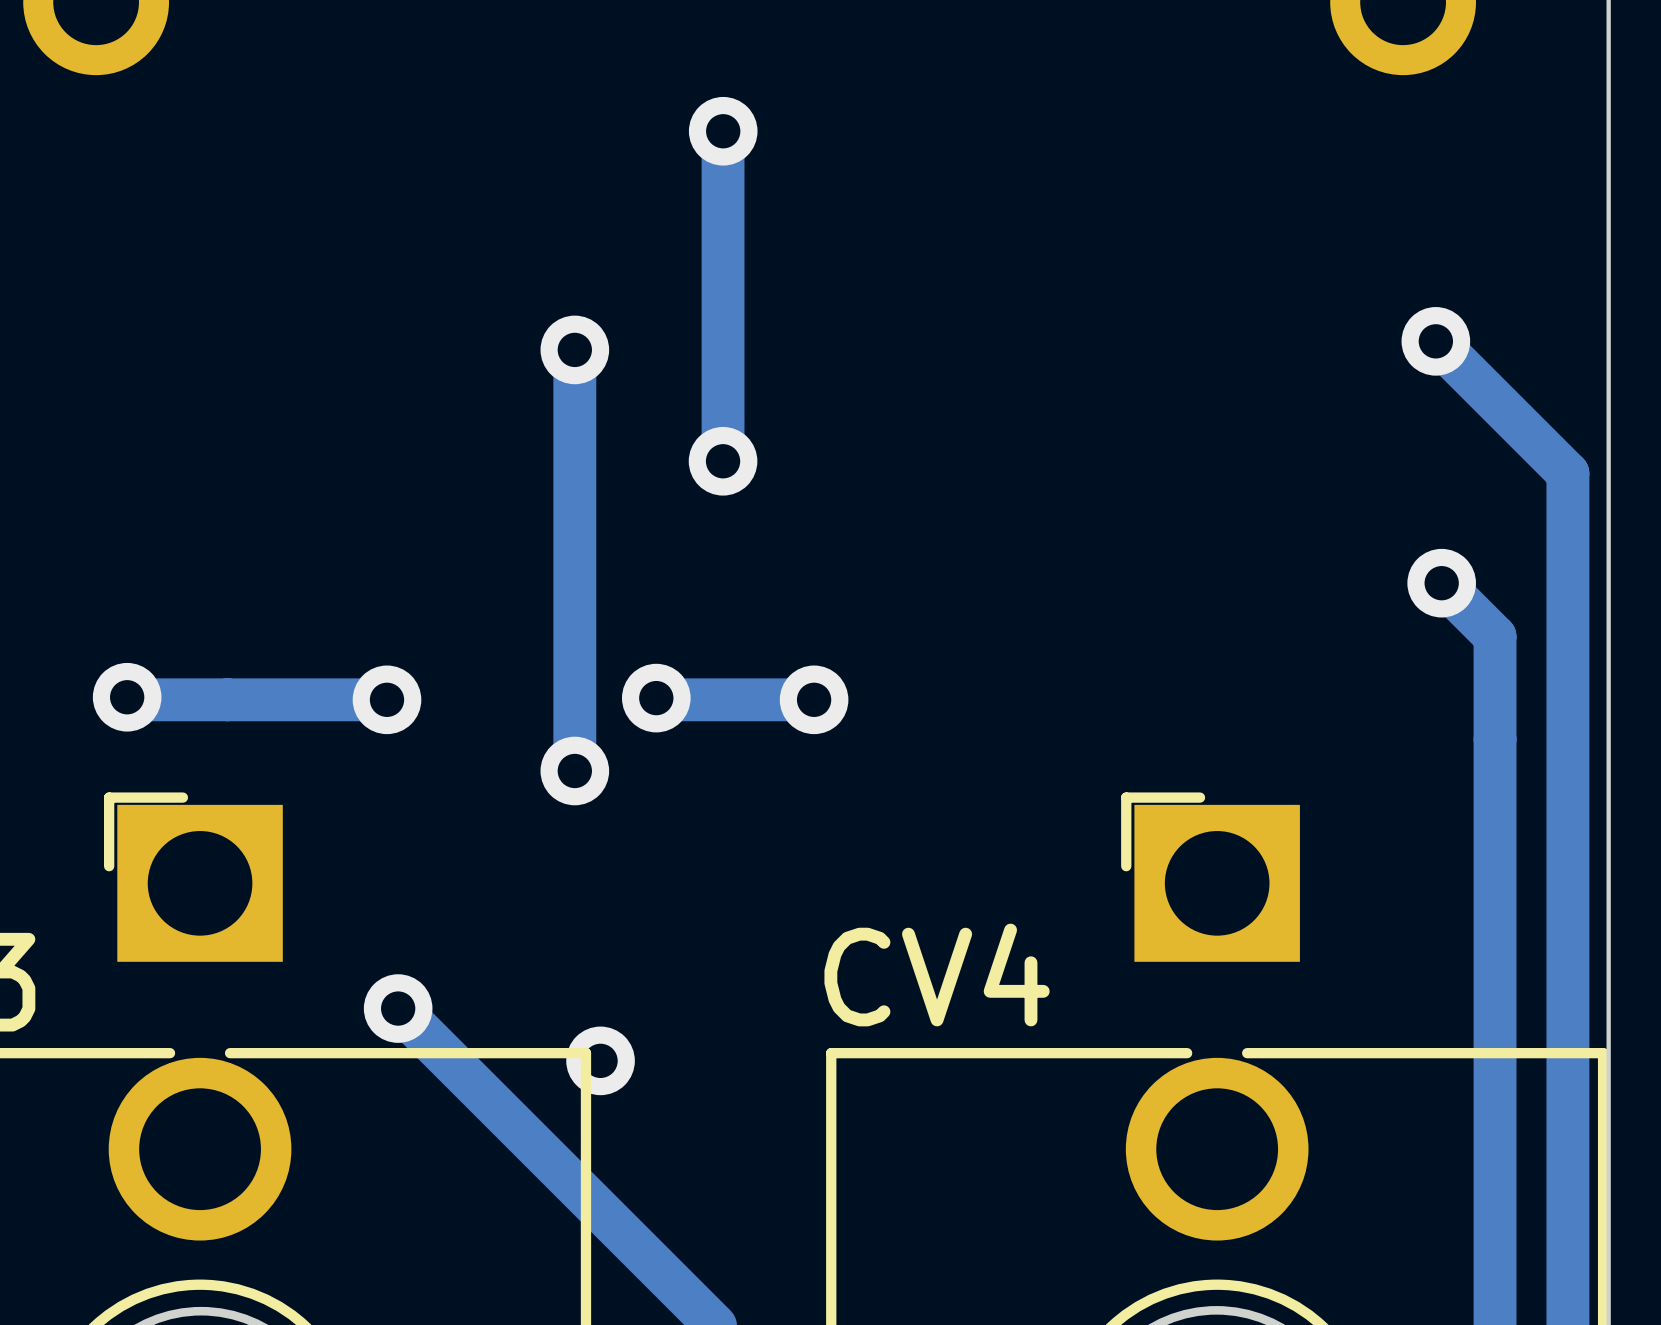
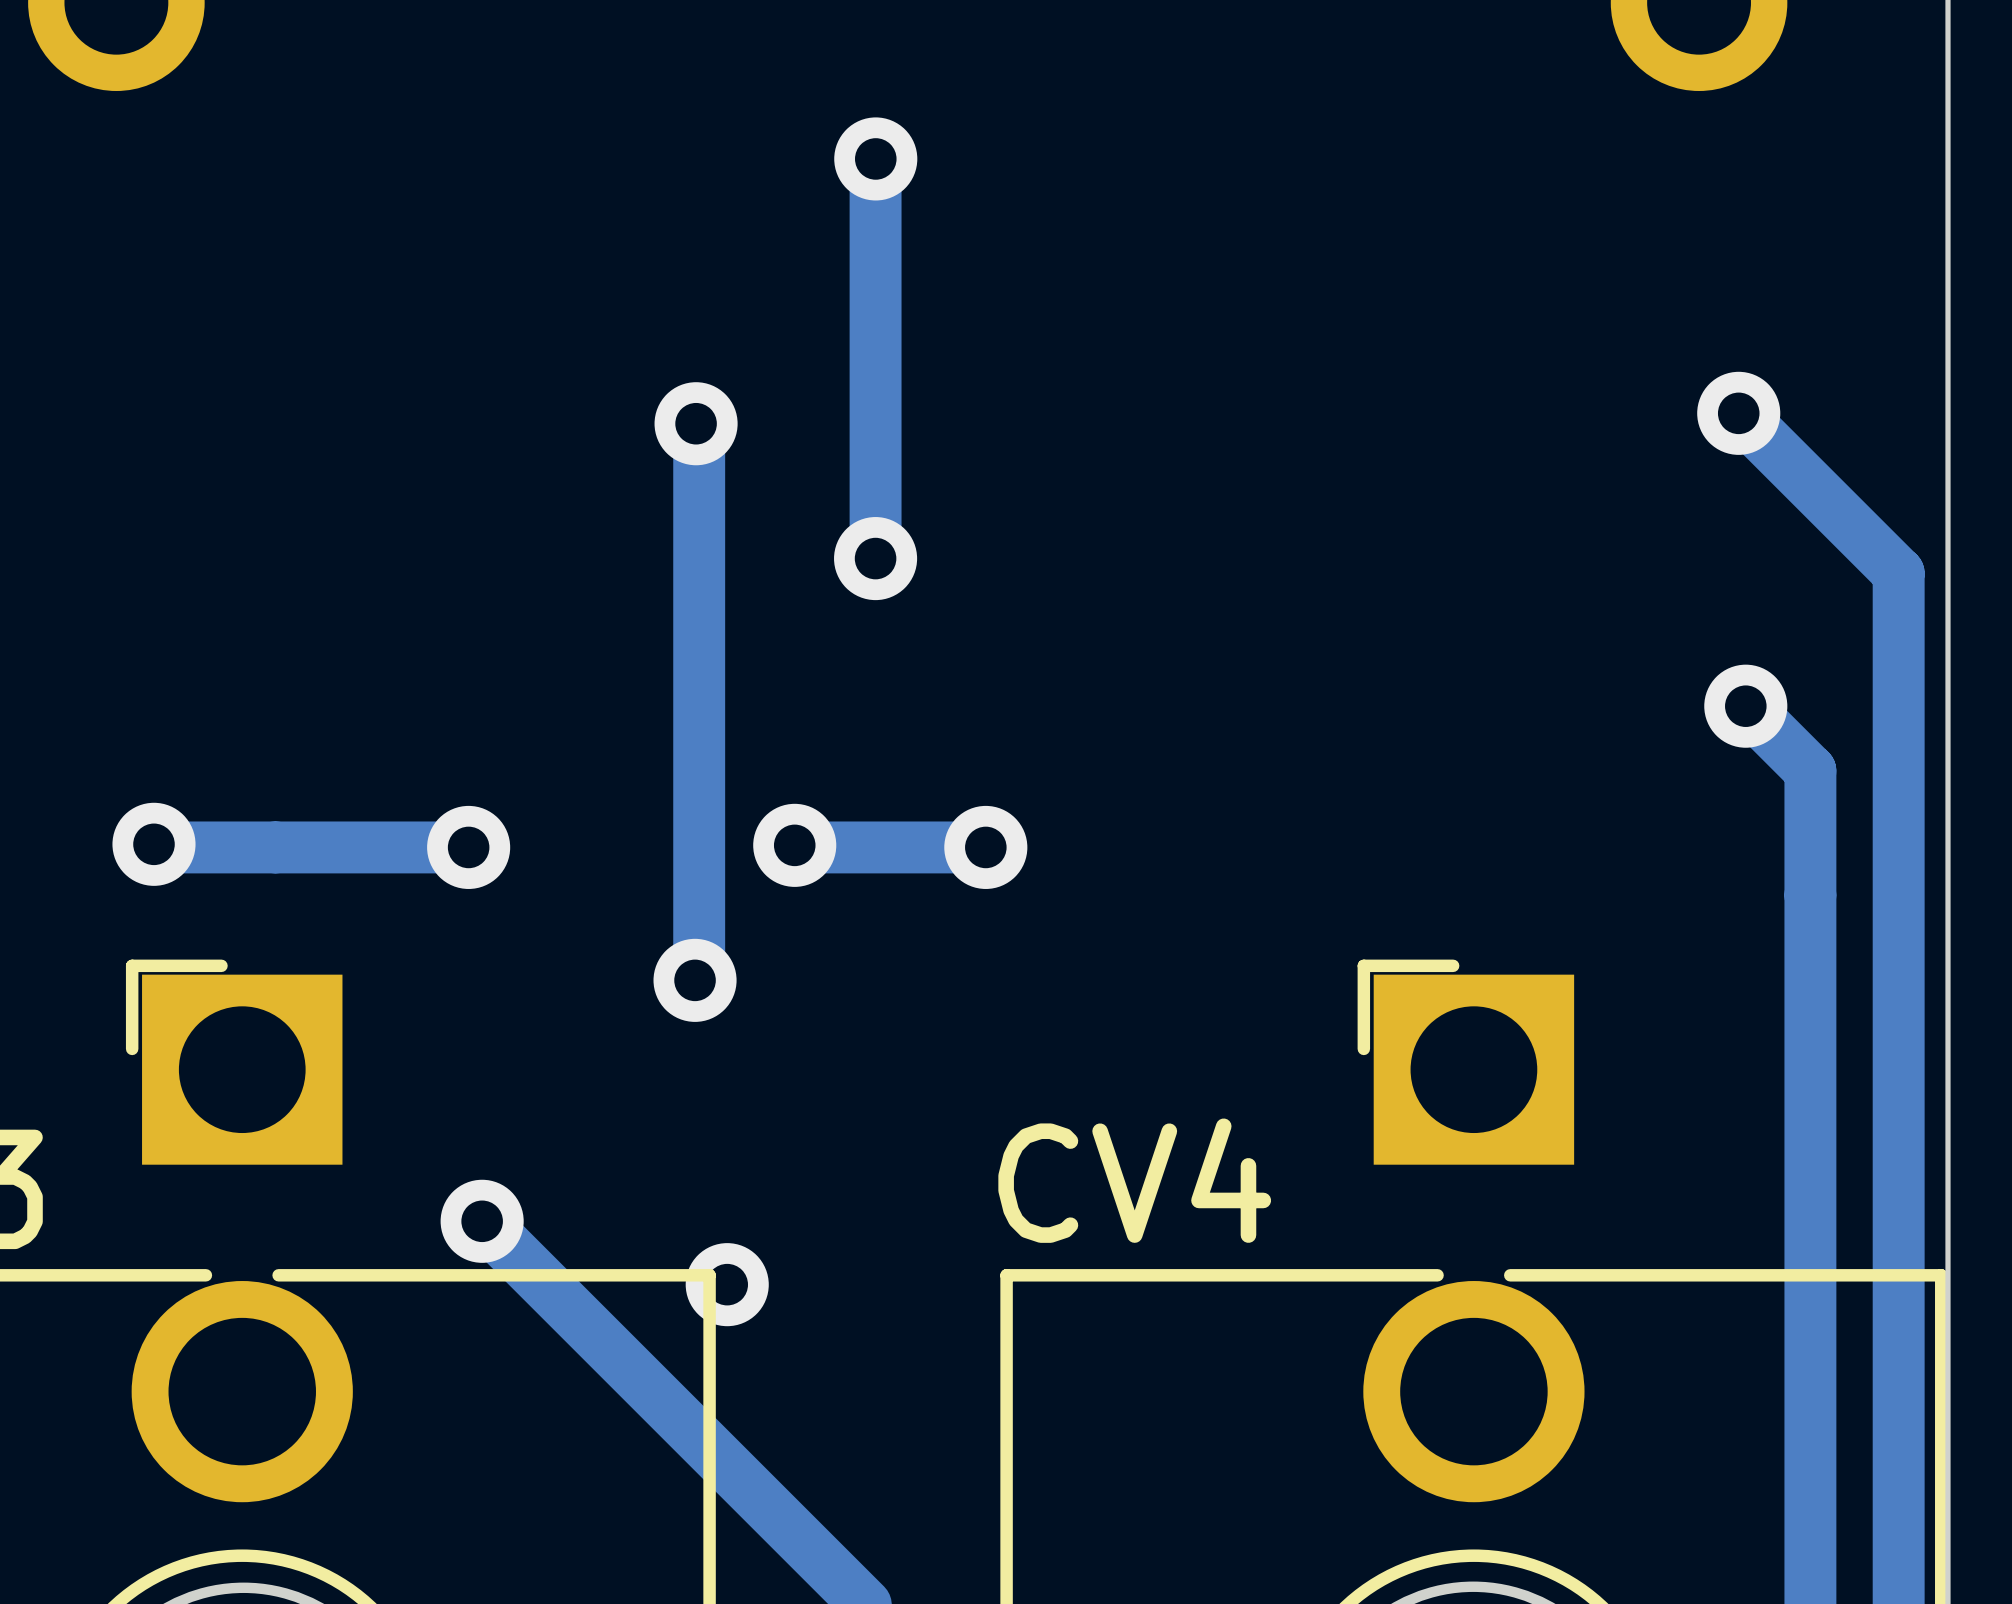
track: (574, 349) (574, 770) -> (699, 422) (699, 976) (695, 980)
via position: (574, 770) -> (695, 980)

